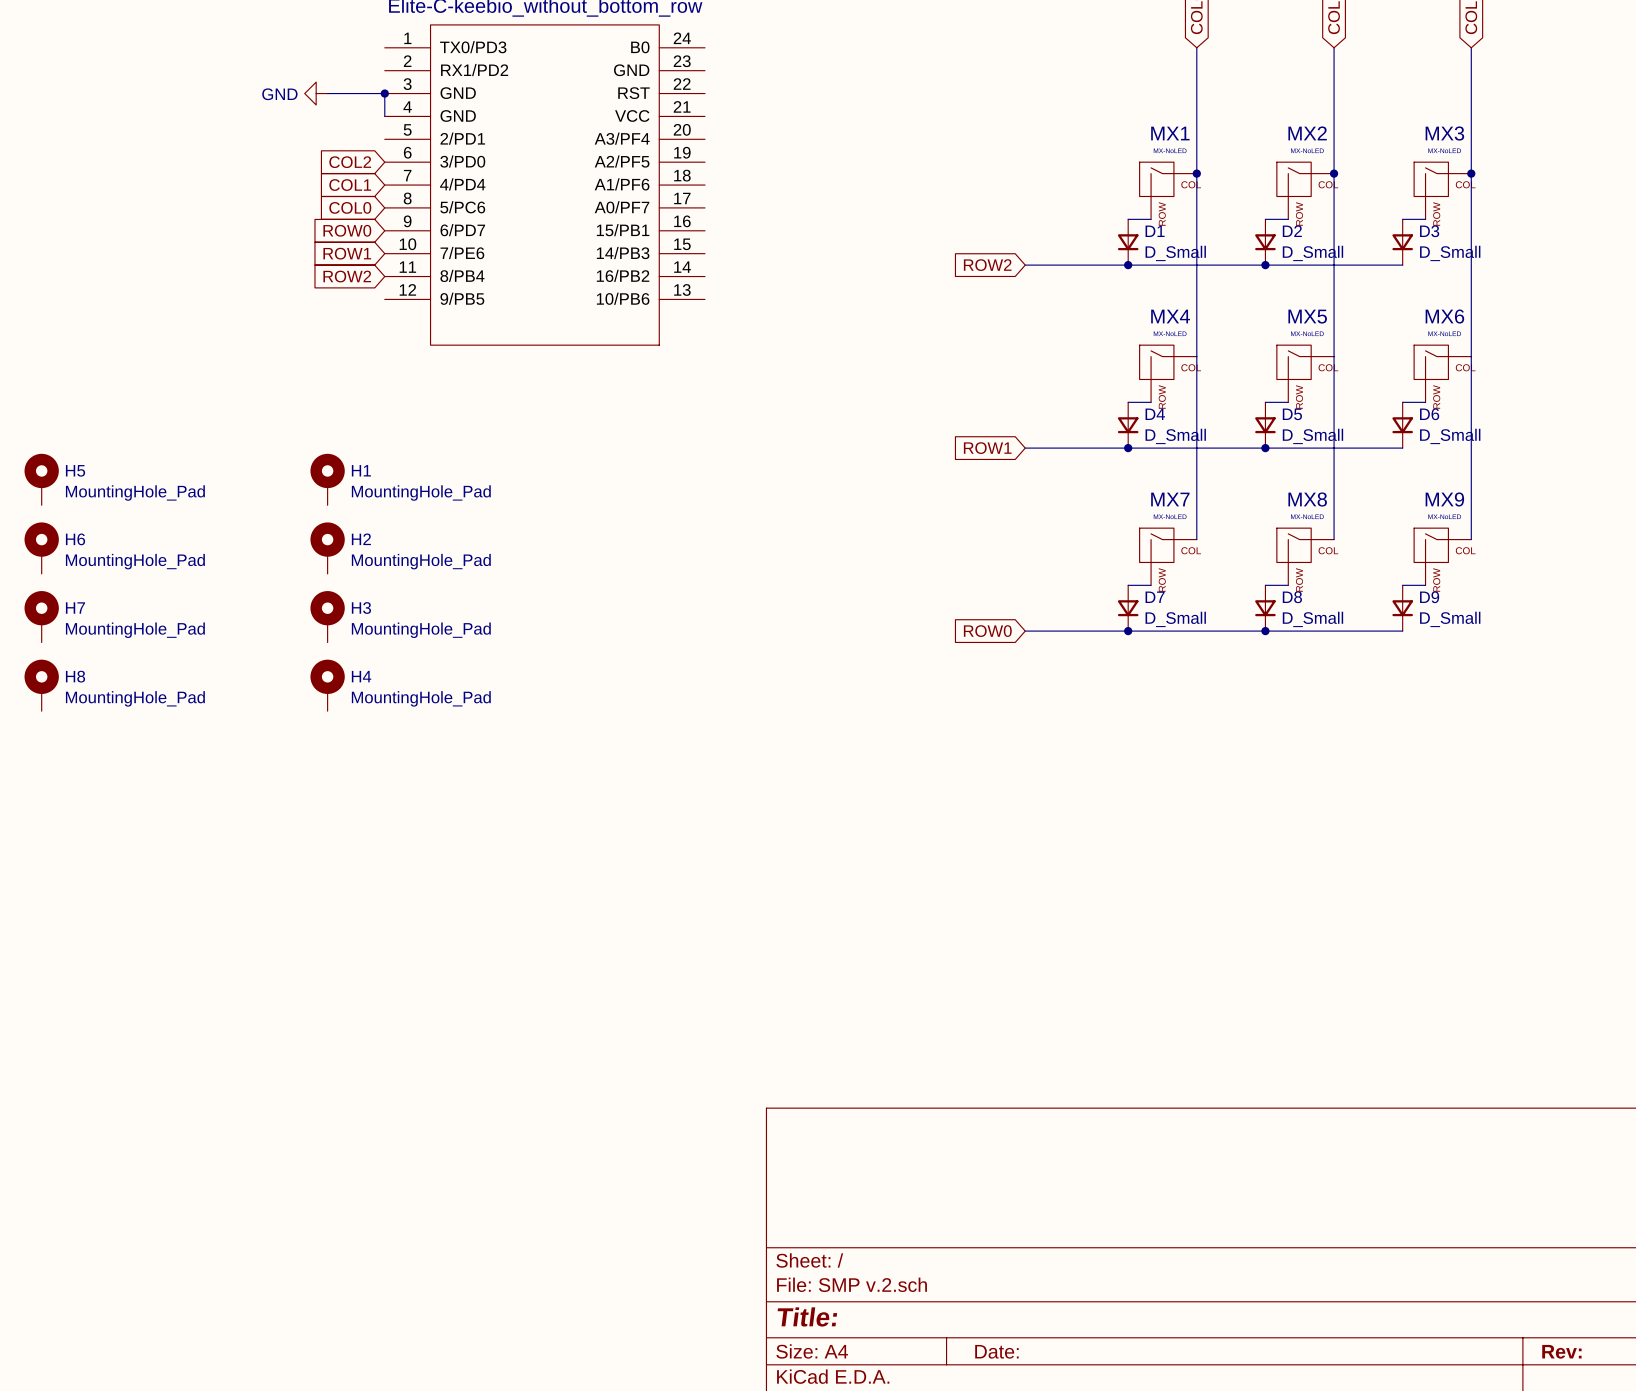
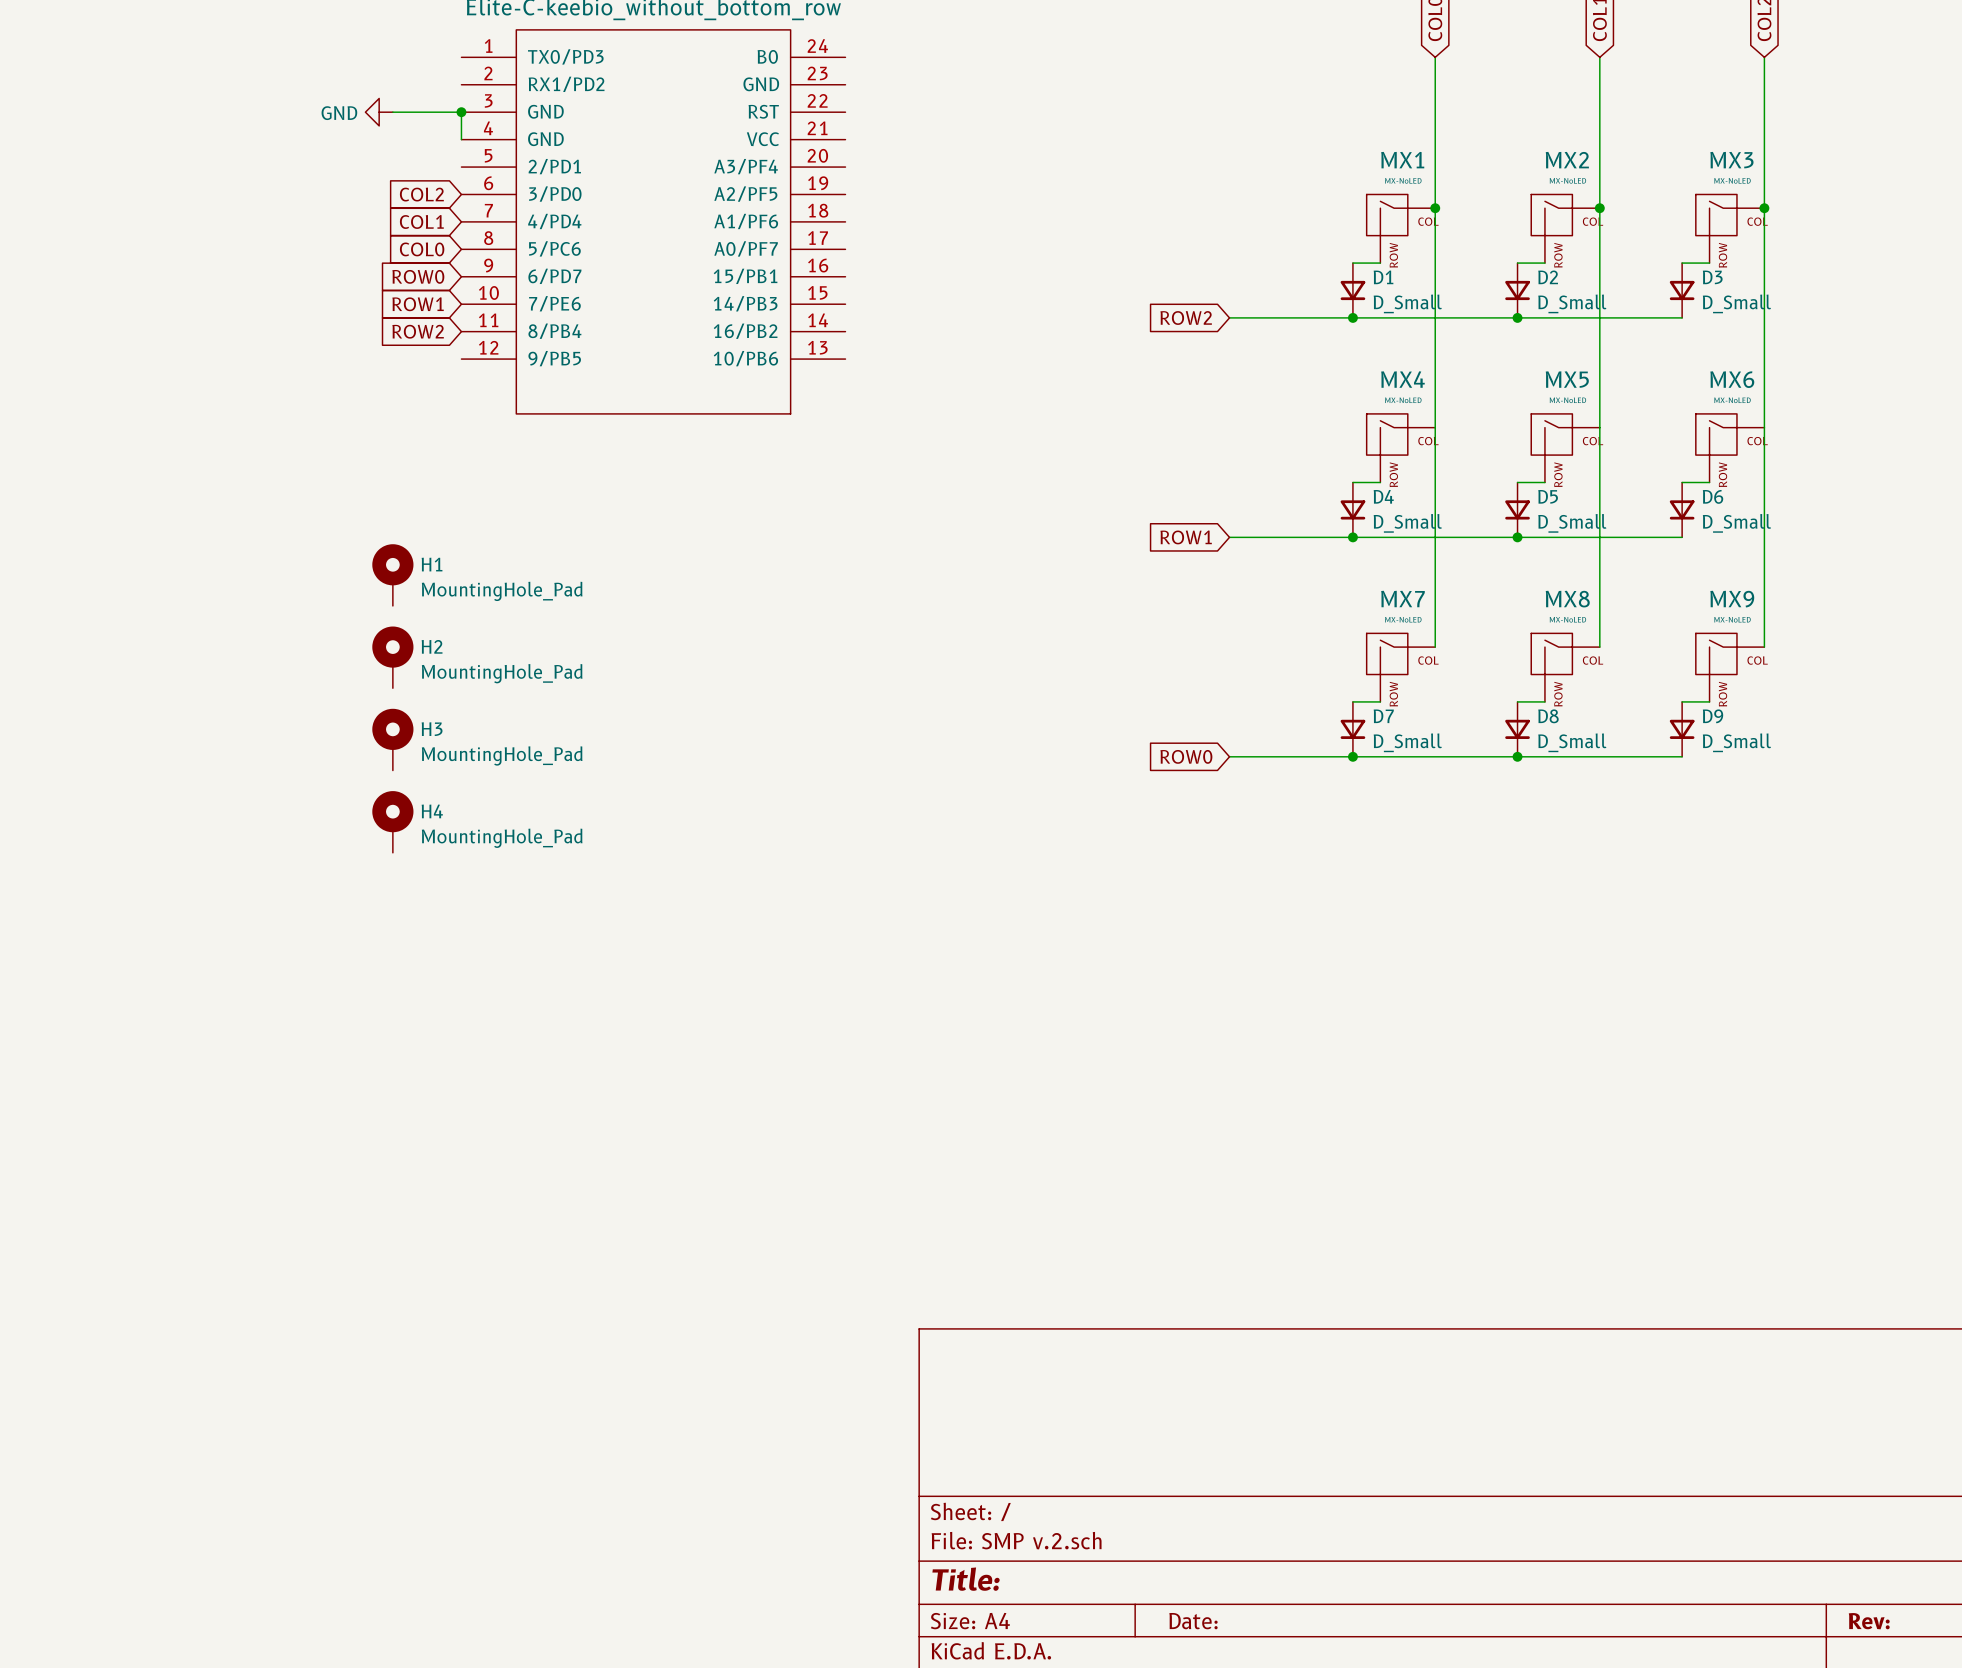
H5: MountingHole_Pad (41, 479) -> none
H6: MountingHole_Pad (41, 548) -> none
H7: MountingHole_Pad (41, 616) -> none
H8: MountingHole_Pad (41, 685) -> none

